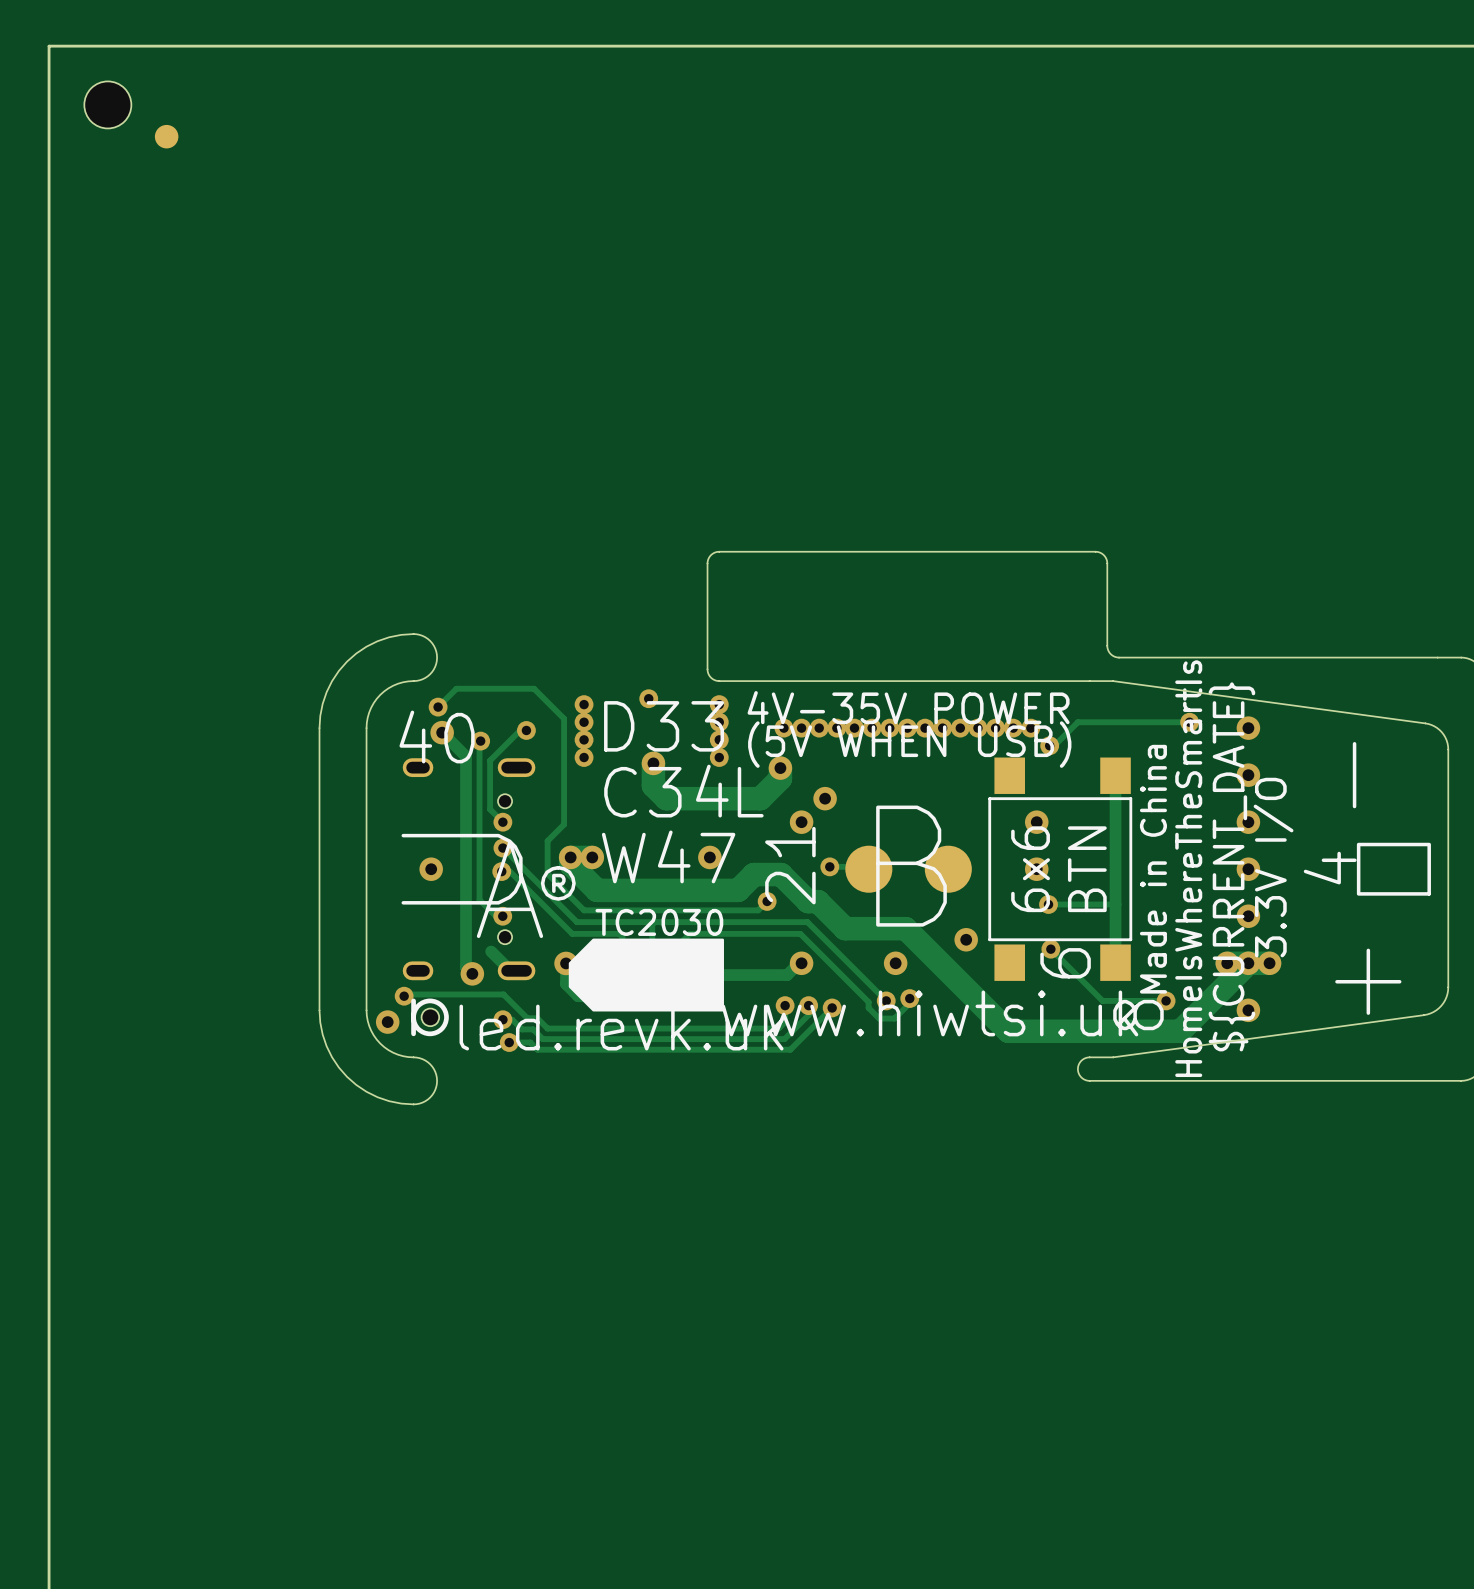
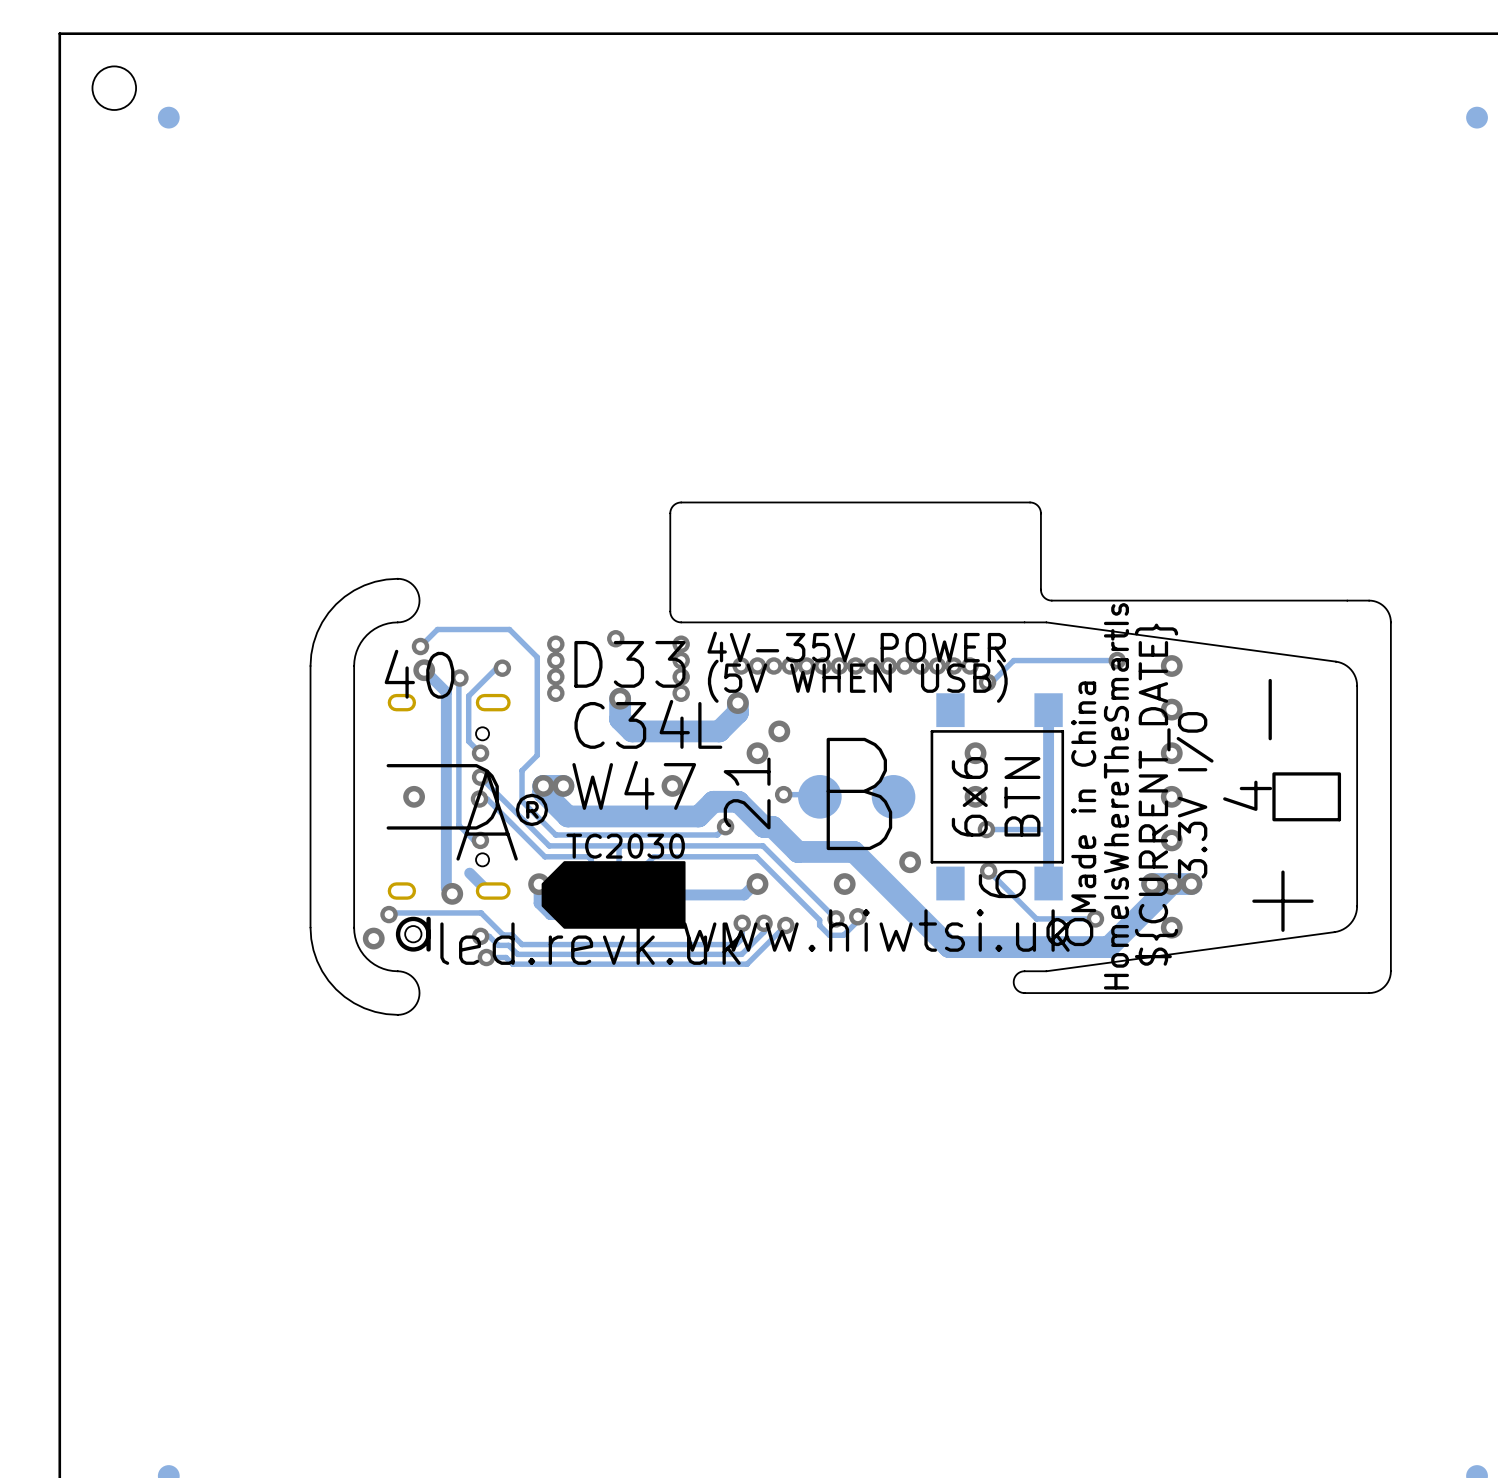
drawing: [411, 998, 449, 1037] -> none
line: (413, 1000) (413, 1033) -> none
part footprint: [421, 1008, 440, 1027] -> [395, 916, 431, 952]

